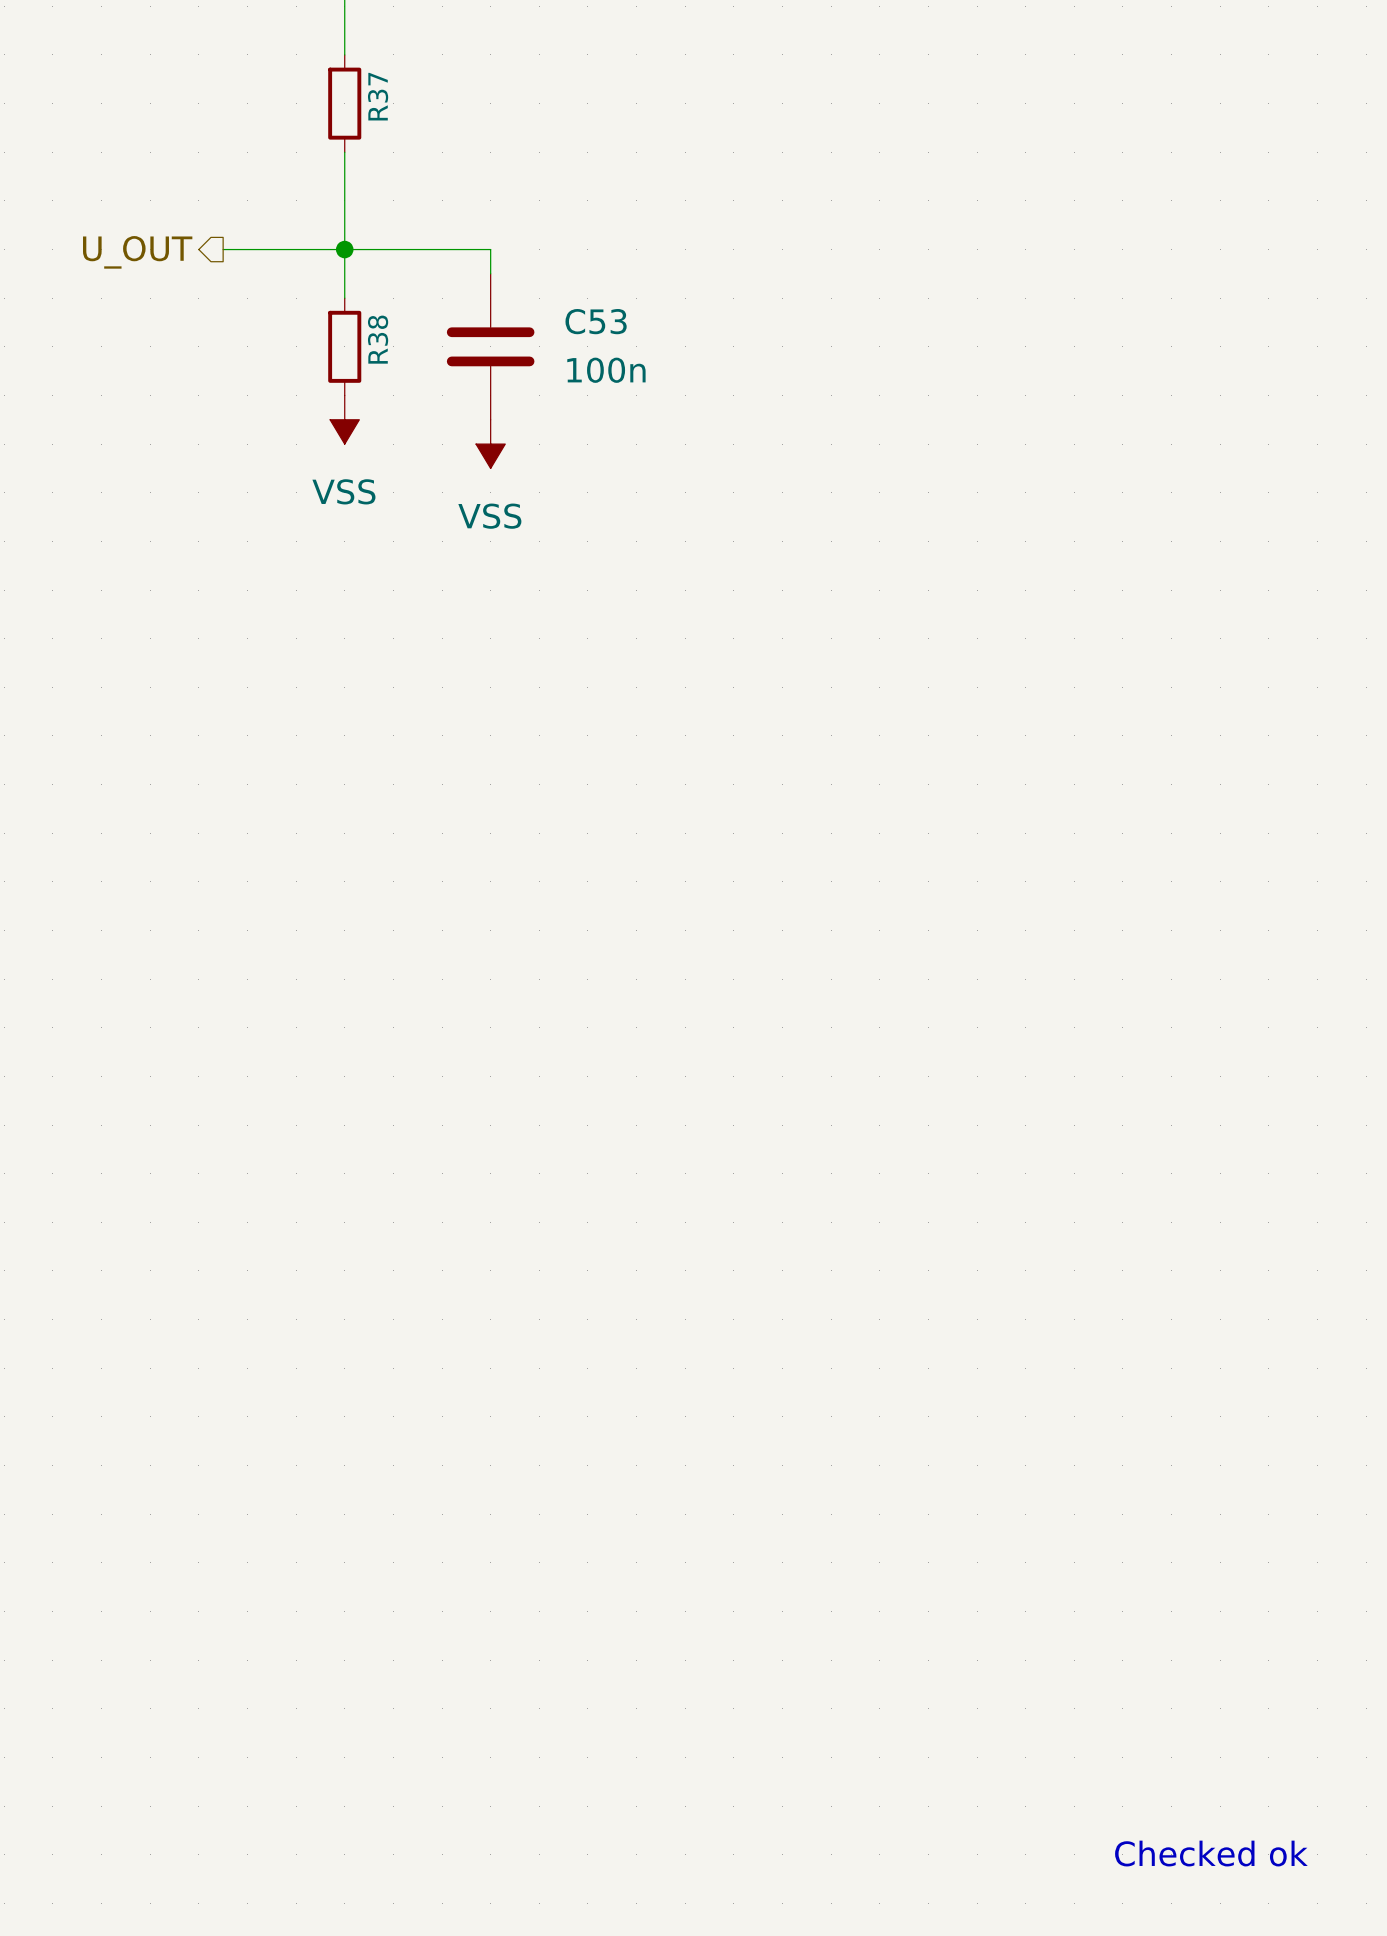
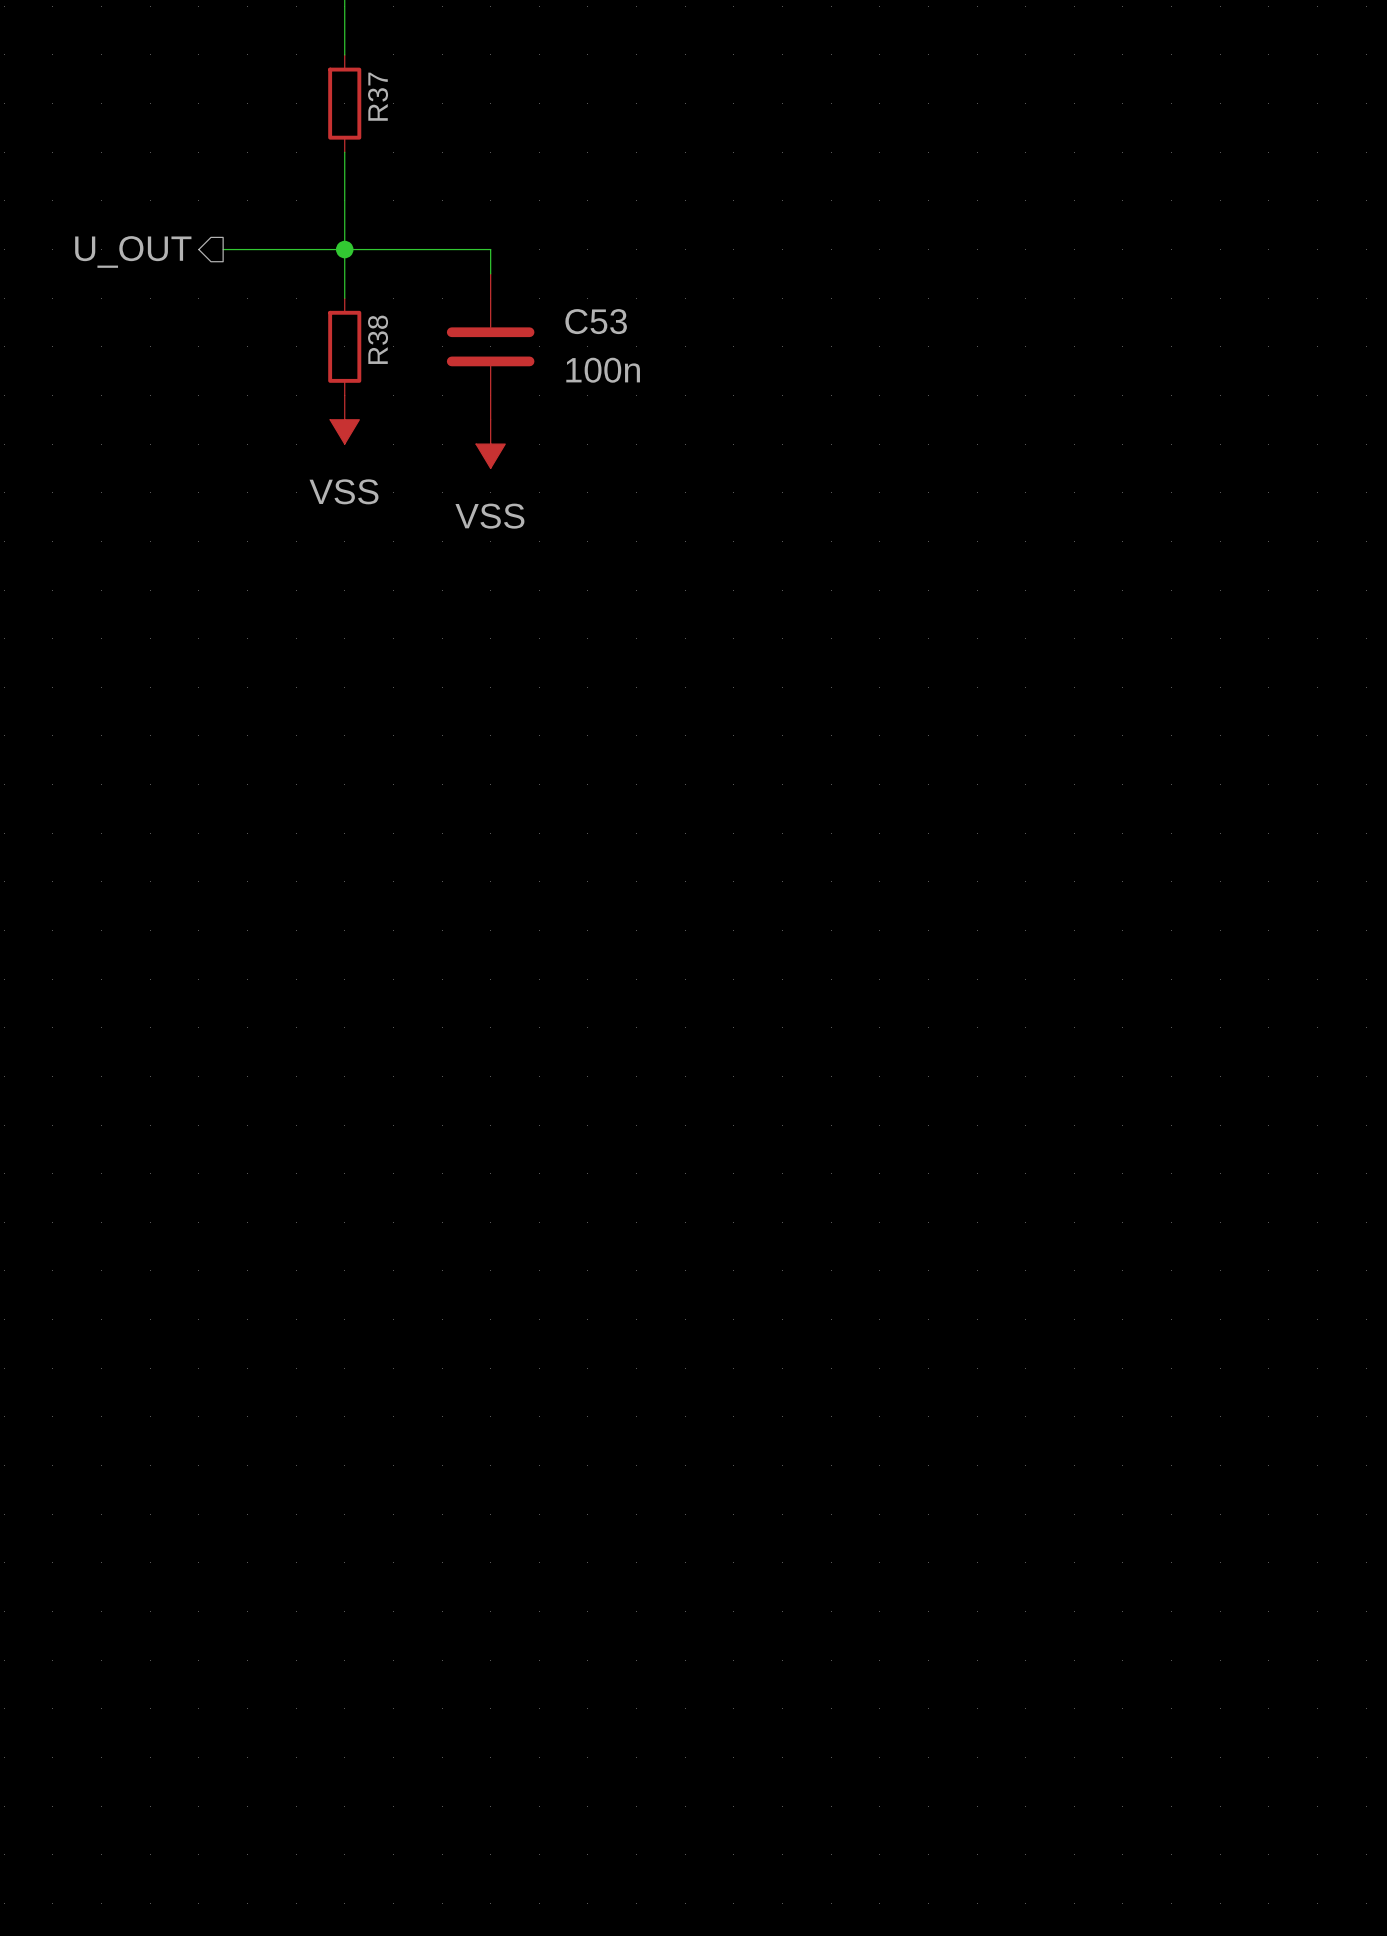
text: Checked ok (1211, 1853) -> none

